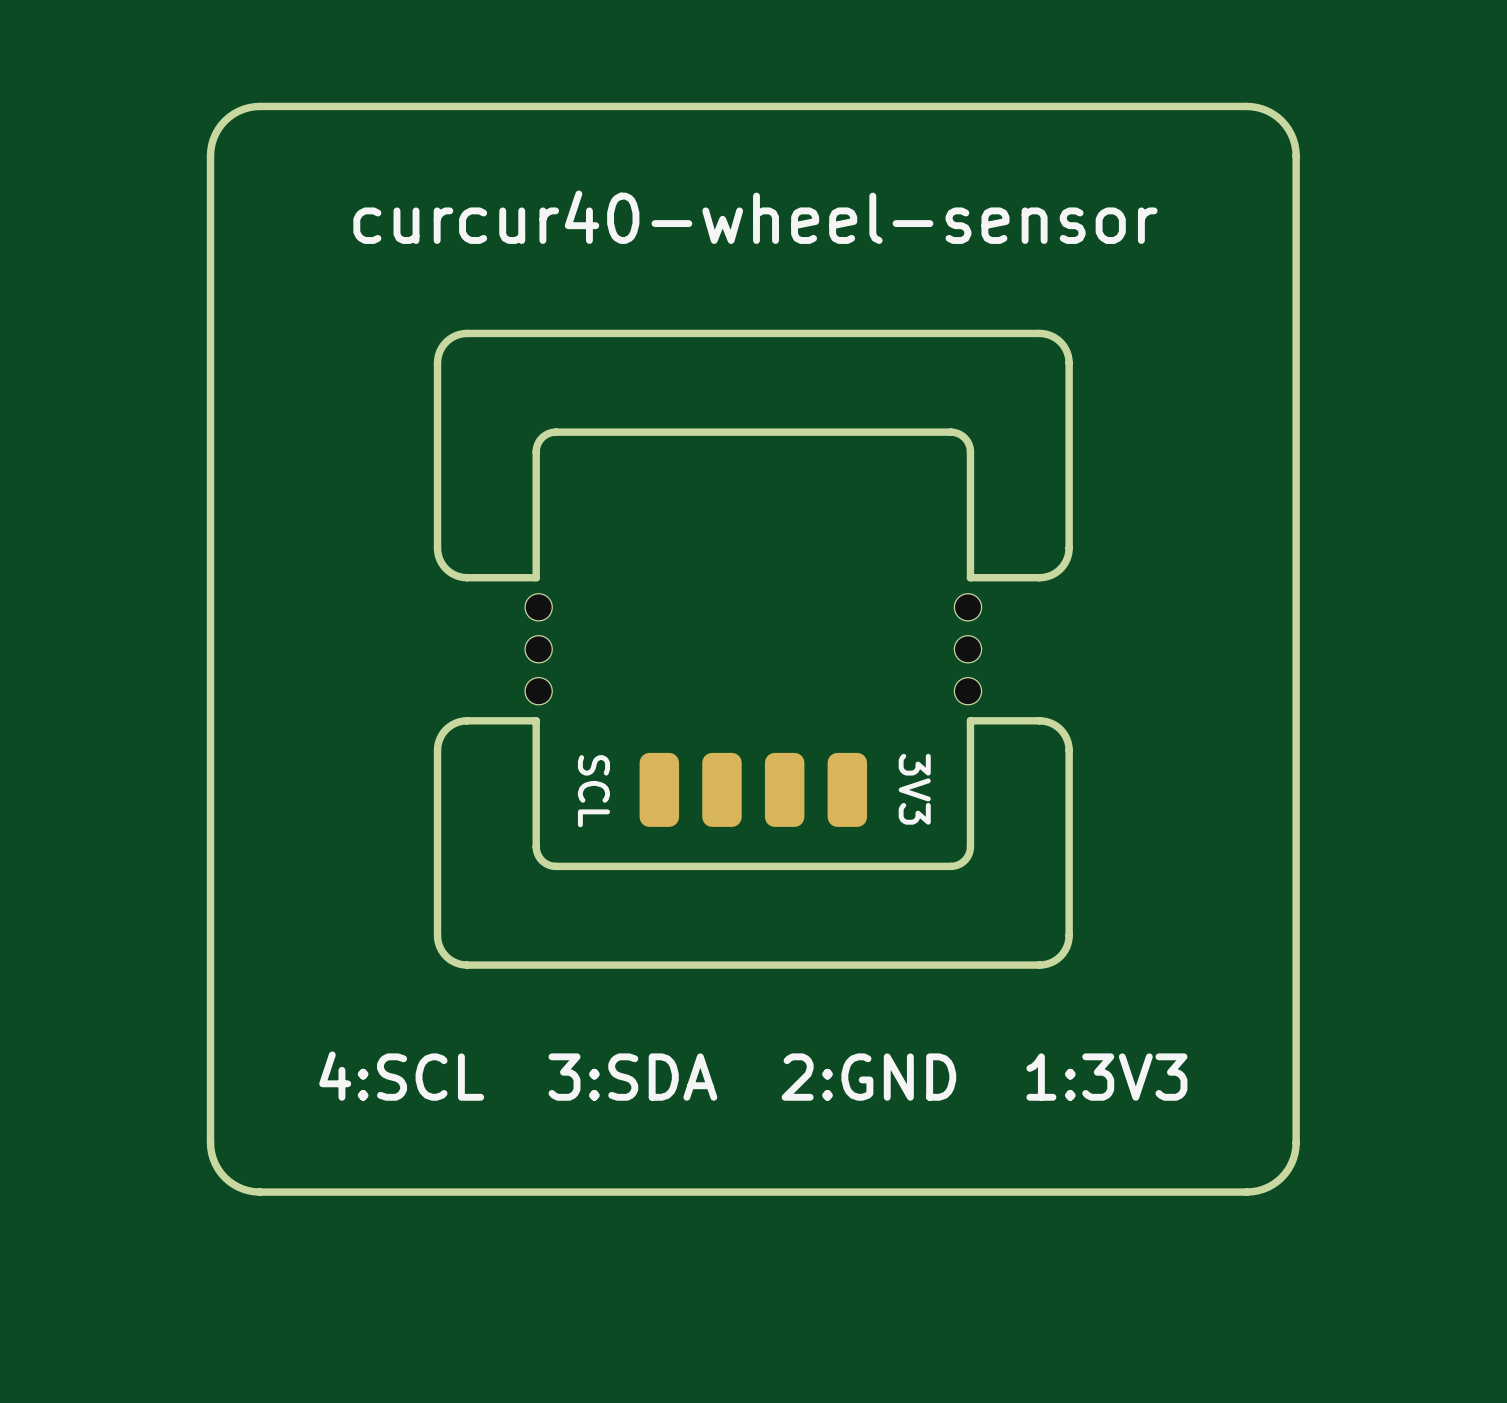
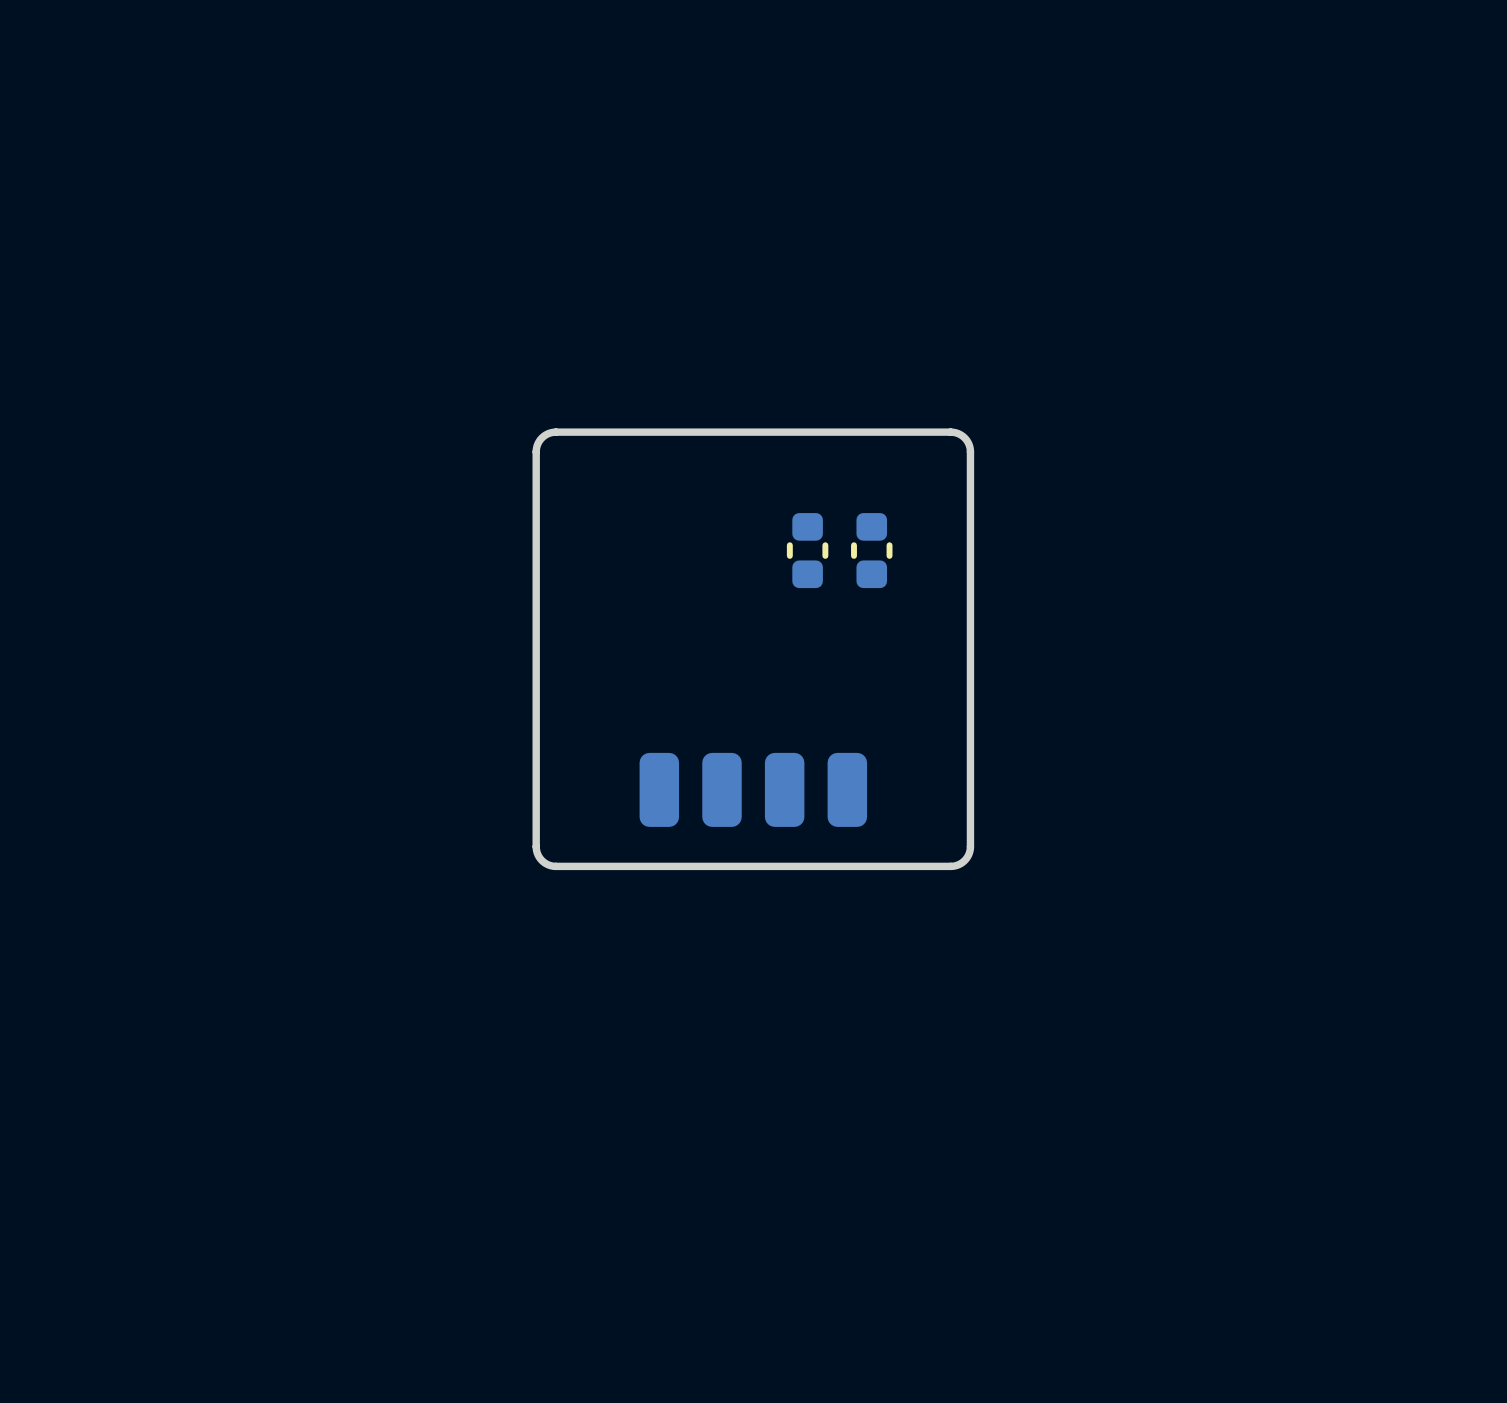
board edge: (1246, 106) (259, 106) (238, 111) (224, 120) (215, 134) (210, 155) (210, 1142) (215, 1164) (224, 1177) (243, 1189) (259, 1192) (1246, 1192) (1263, 1189) (1281, 1177) (1293, 1159) (1296, 1142) (1296, 155) (1291, 134) (1281, 120) (1268, 111) (1246, 106) -> none
text: curcur40-wheel-sensor (755, 217) -> none
part: none -> (807, 550)
part: none -> (871, 550)
board edge: (970, 577) (1047, 576) (1060, 569) (1068, 555) (1068, 359) (1063, 345) (1057, 339) (1047, 334) (467, 333) (455, 335) (443, 345) (437, 359) (438, 555) (446, 569) (459, 576) (536, 577) -> (970, 577) (970, 720)
part: (538, 649) -> none
part: (967, 649) -> none
board edge: (970, 720) (1047, 721) (1060, 729) (1068, 742) (1068, 939) (1063, 953) (1050, 962) (1039, 965) (459, 964) (446, 956) (441, 950) (437, 939) (438, 742) (446, 729) (459, 721) (536, 720) -> (536, 577) (536, 720)
text: 3V3 (914, 789) -> none
text: SCL (593, 791) -> none
text: 4:SCL 3:SDA 2:GND 1:3V3 (753, 1076) -> none

